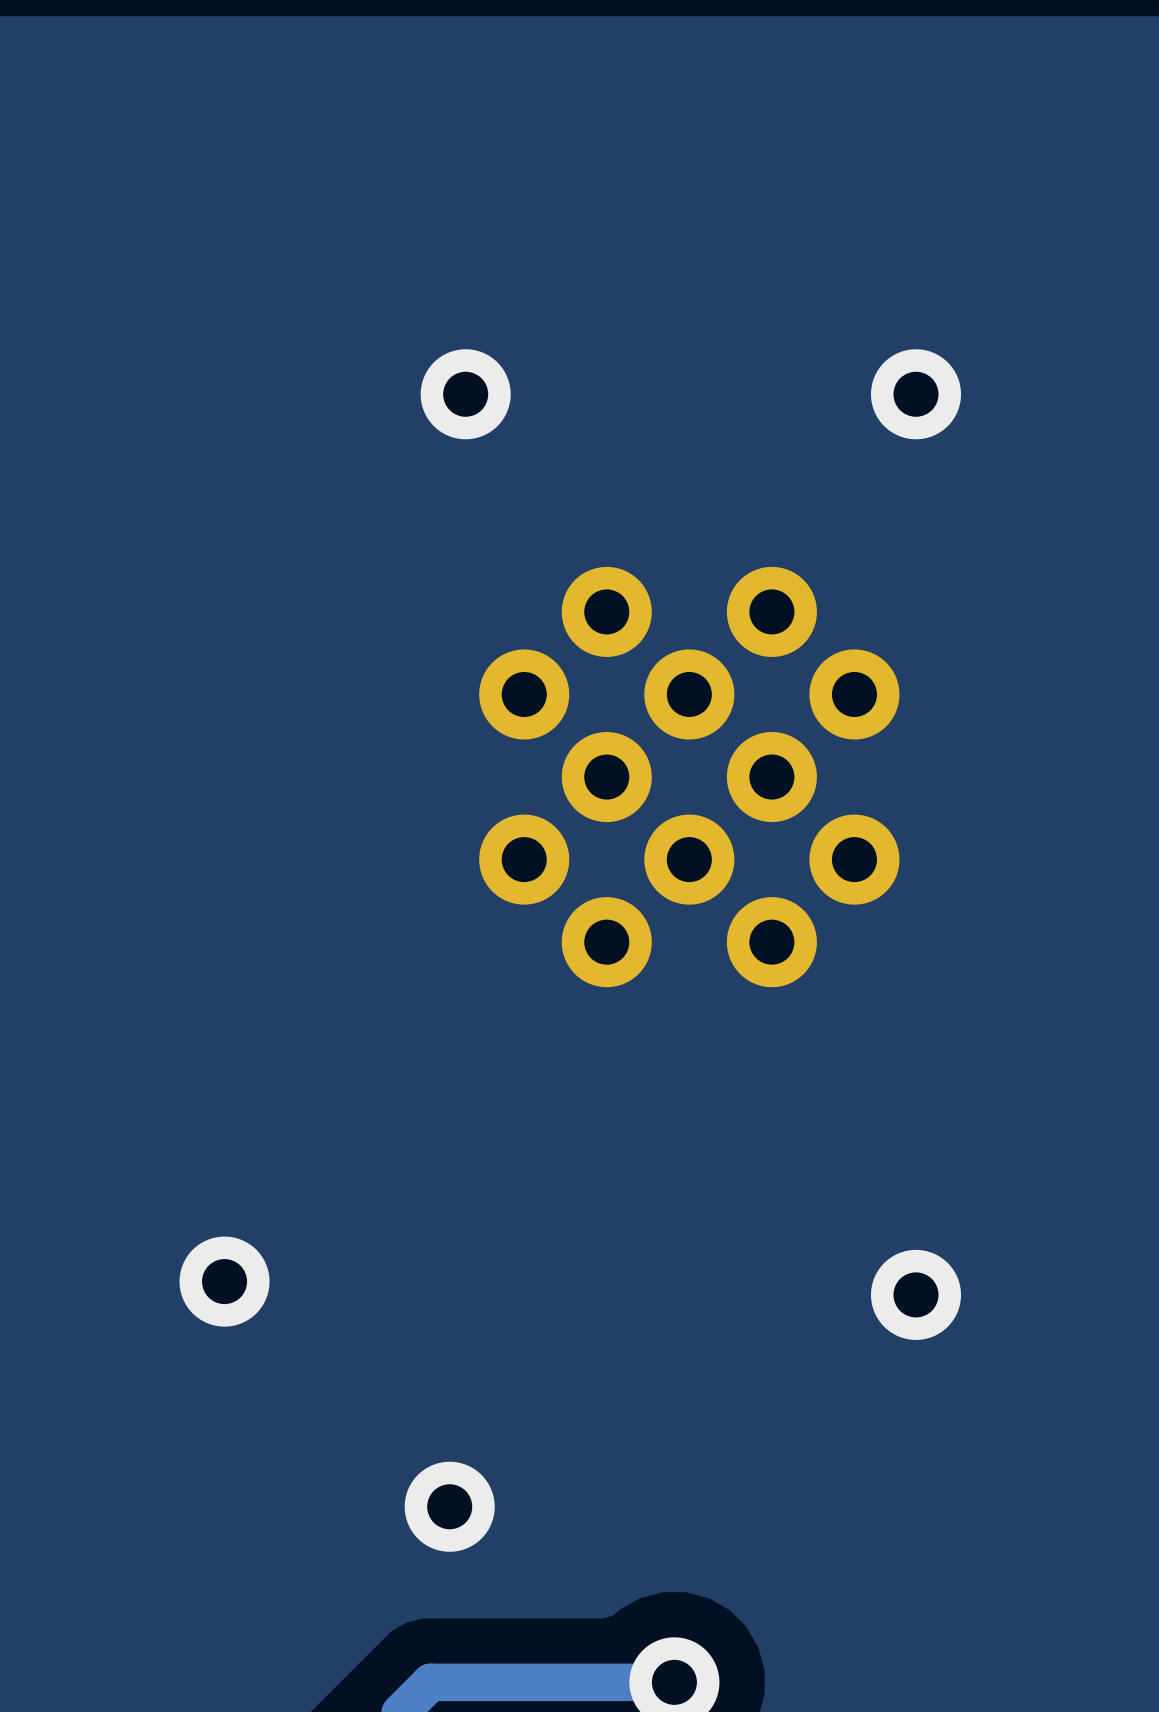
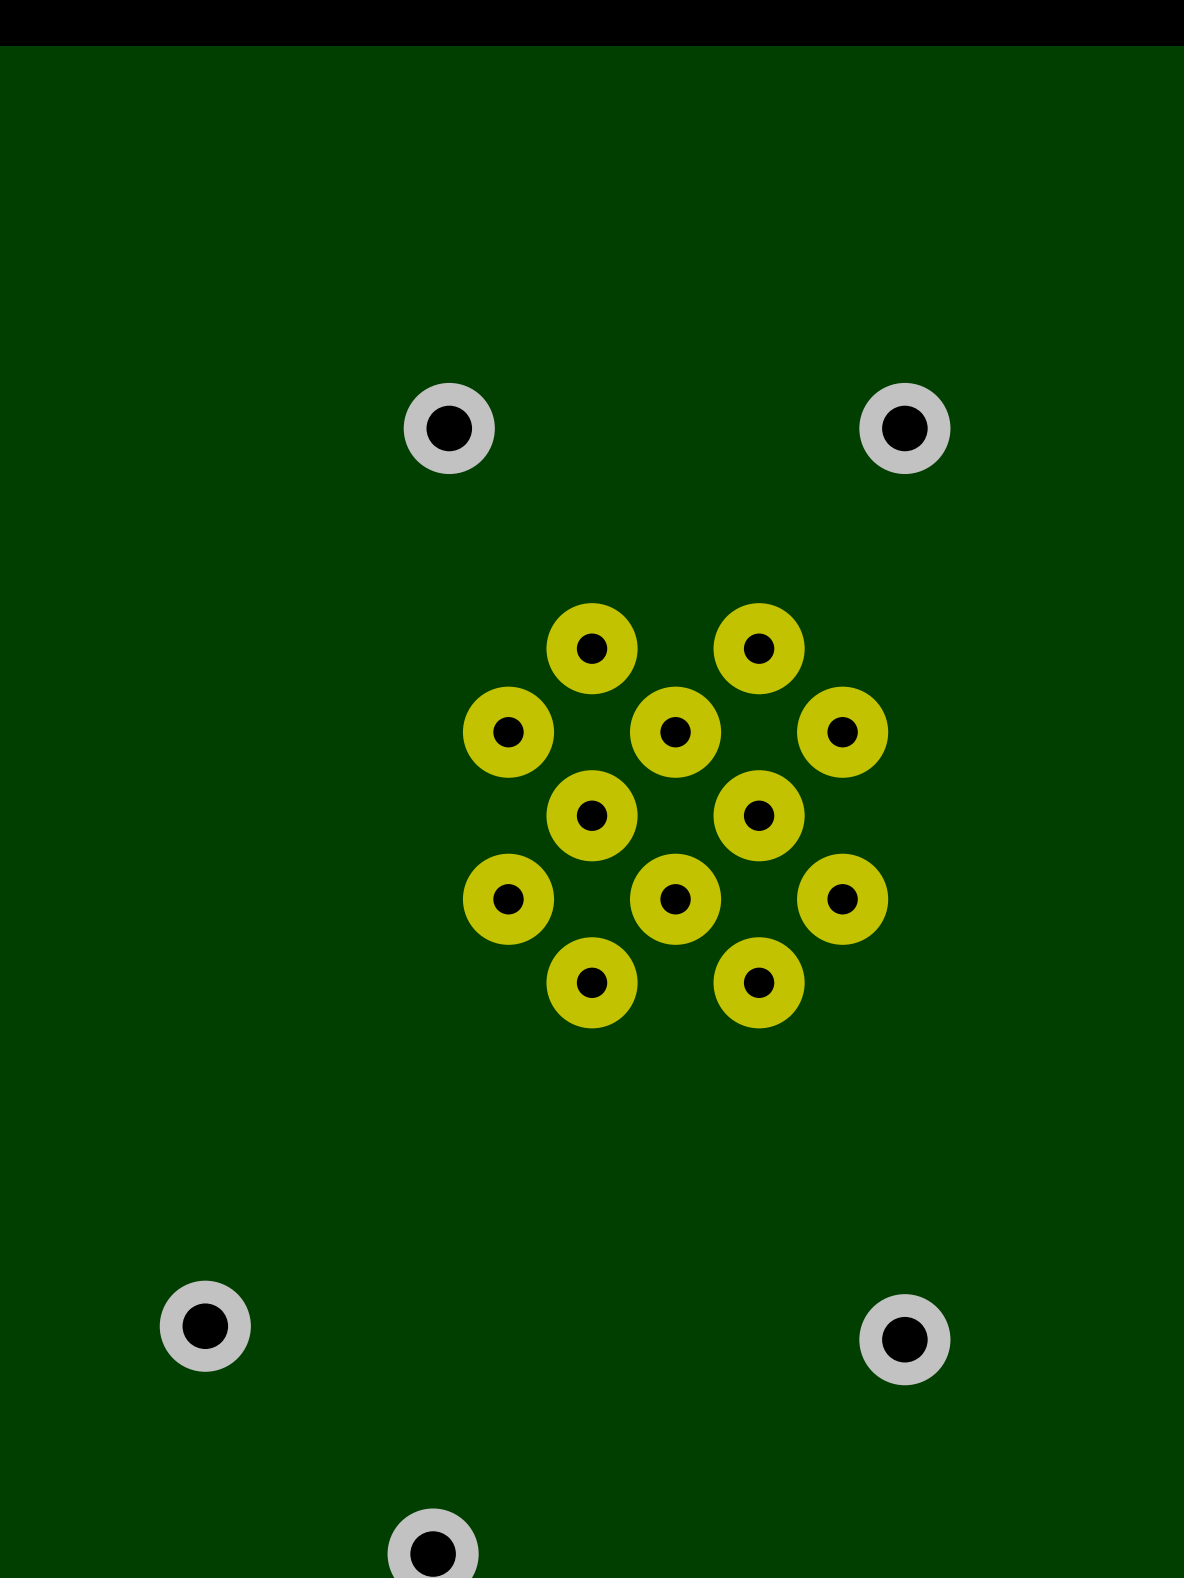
part footprint: [479, 566, 900, 988] -> [462, 603, 889, 1029]

